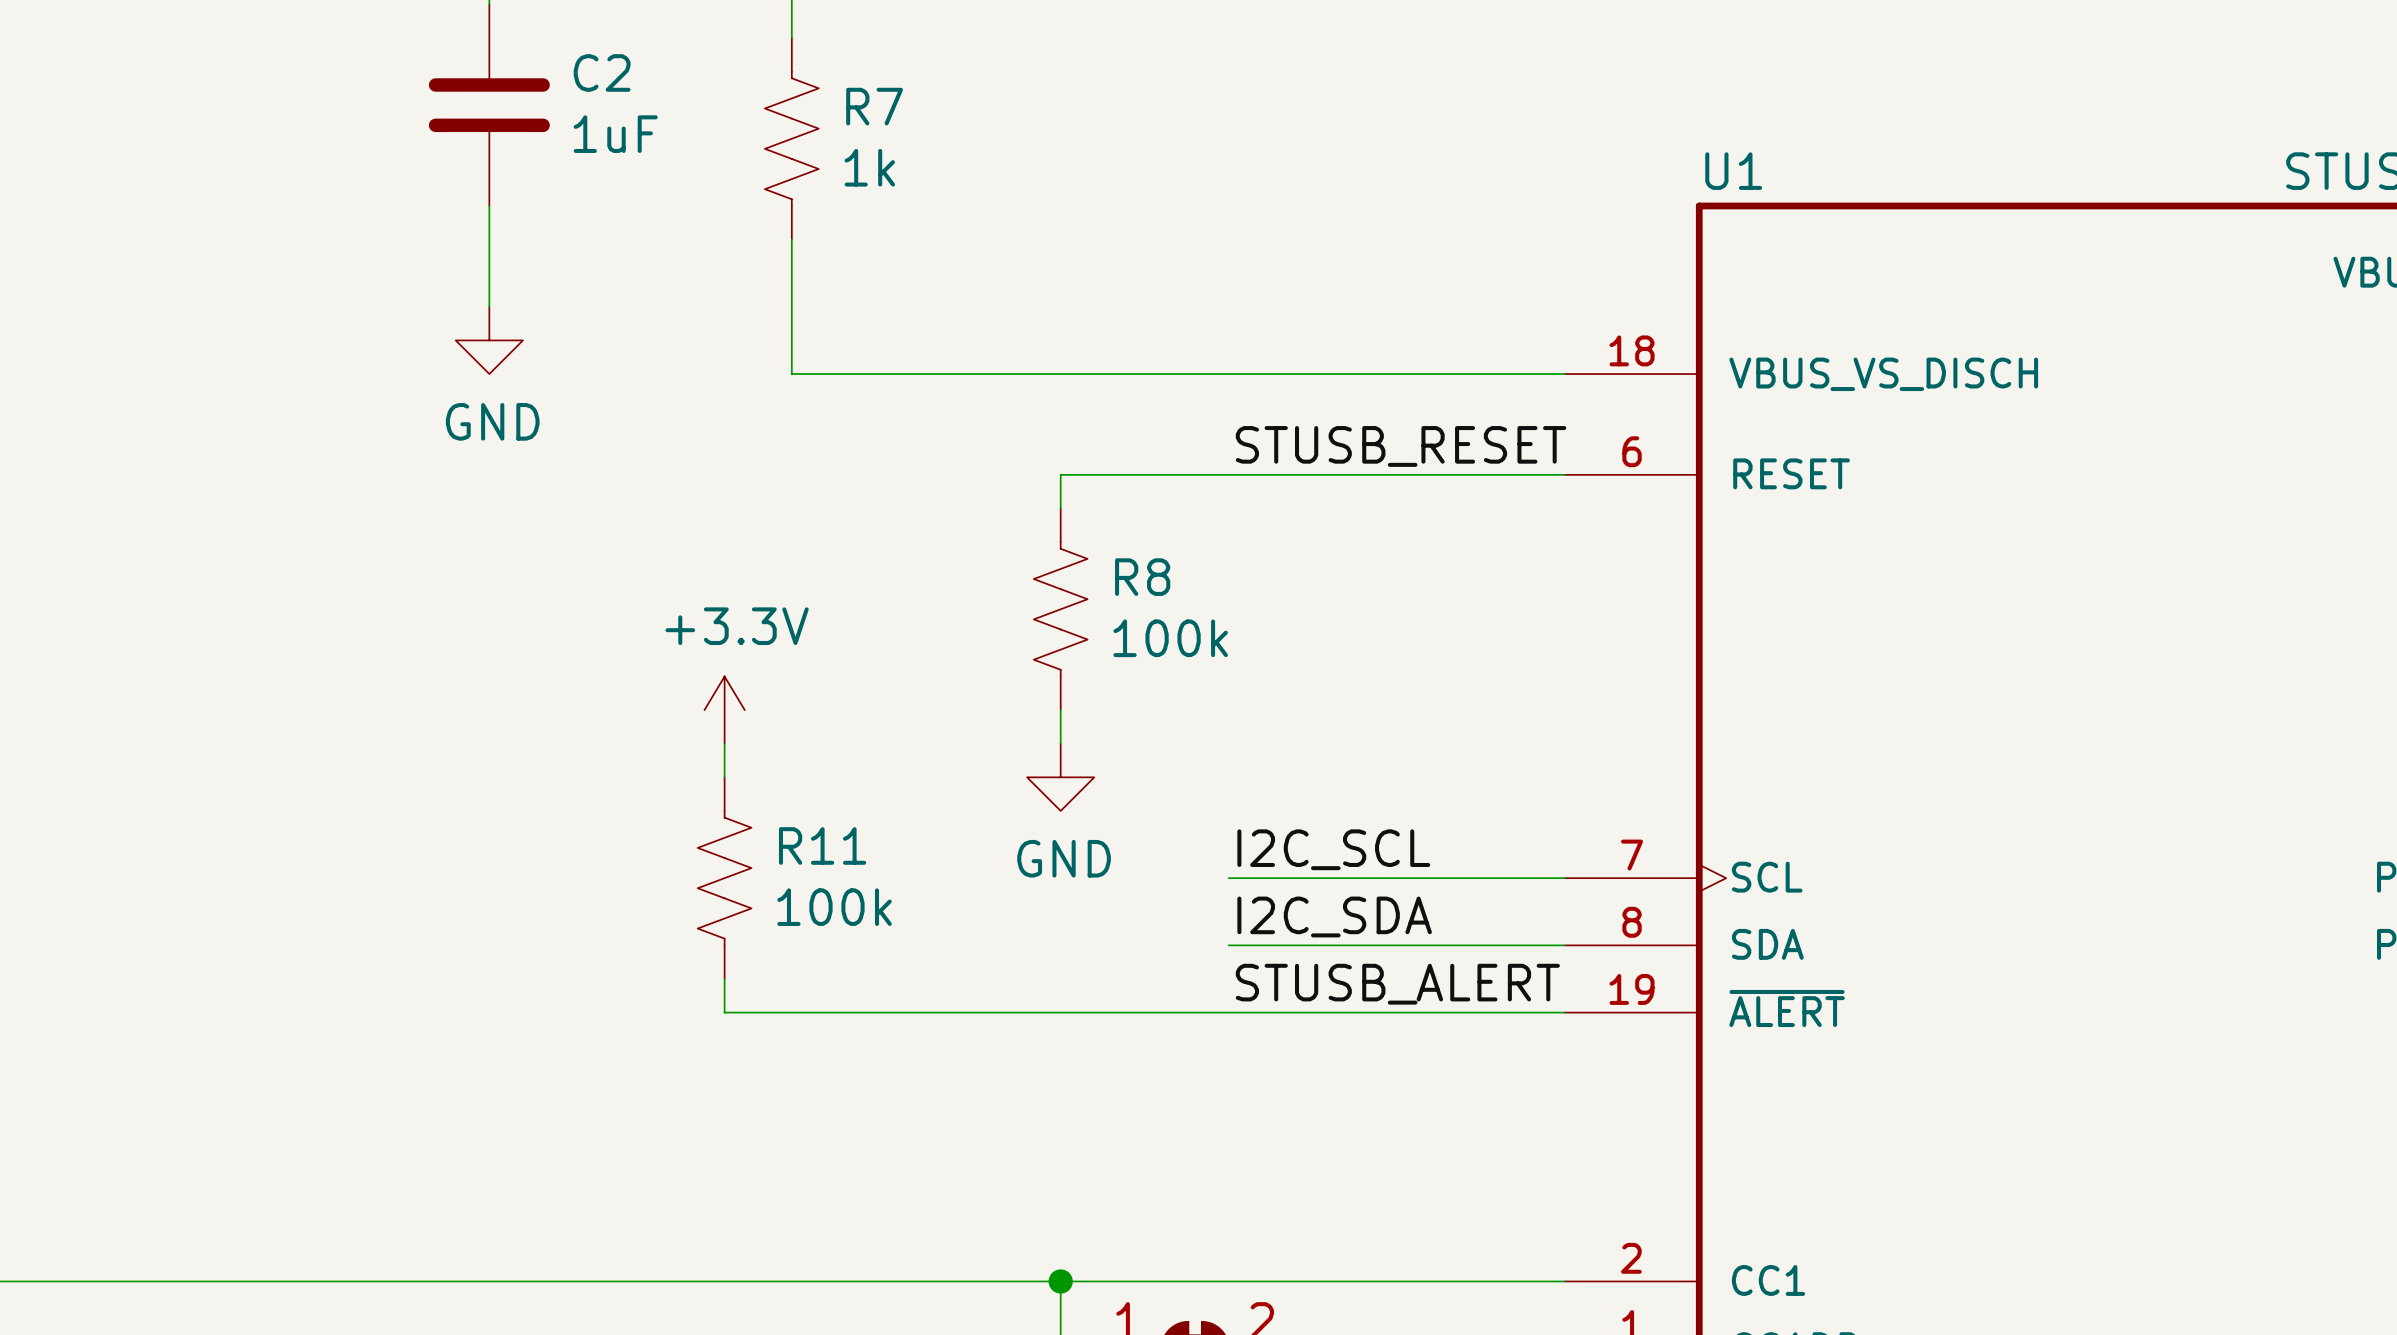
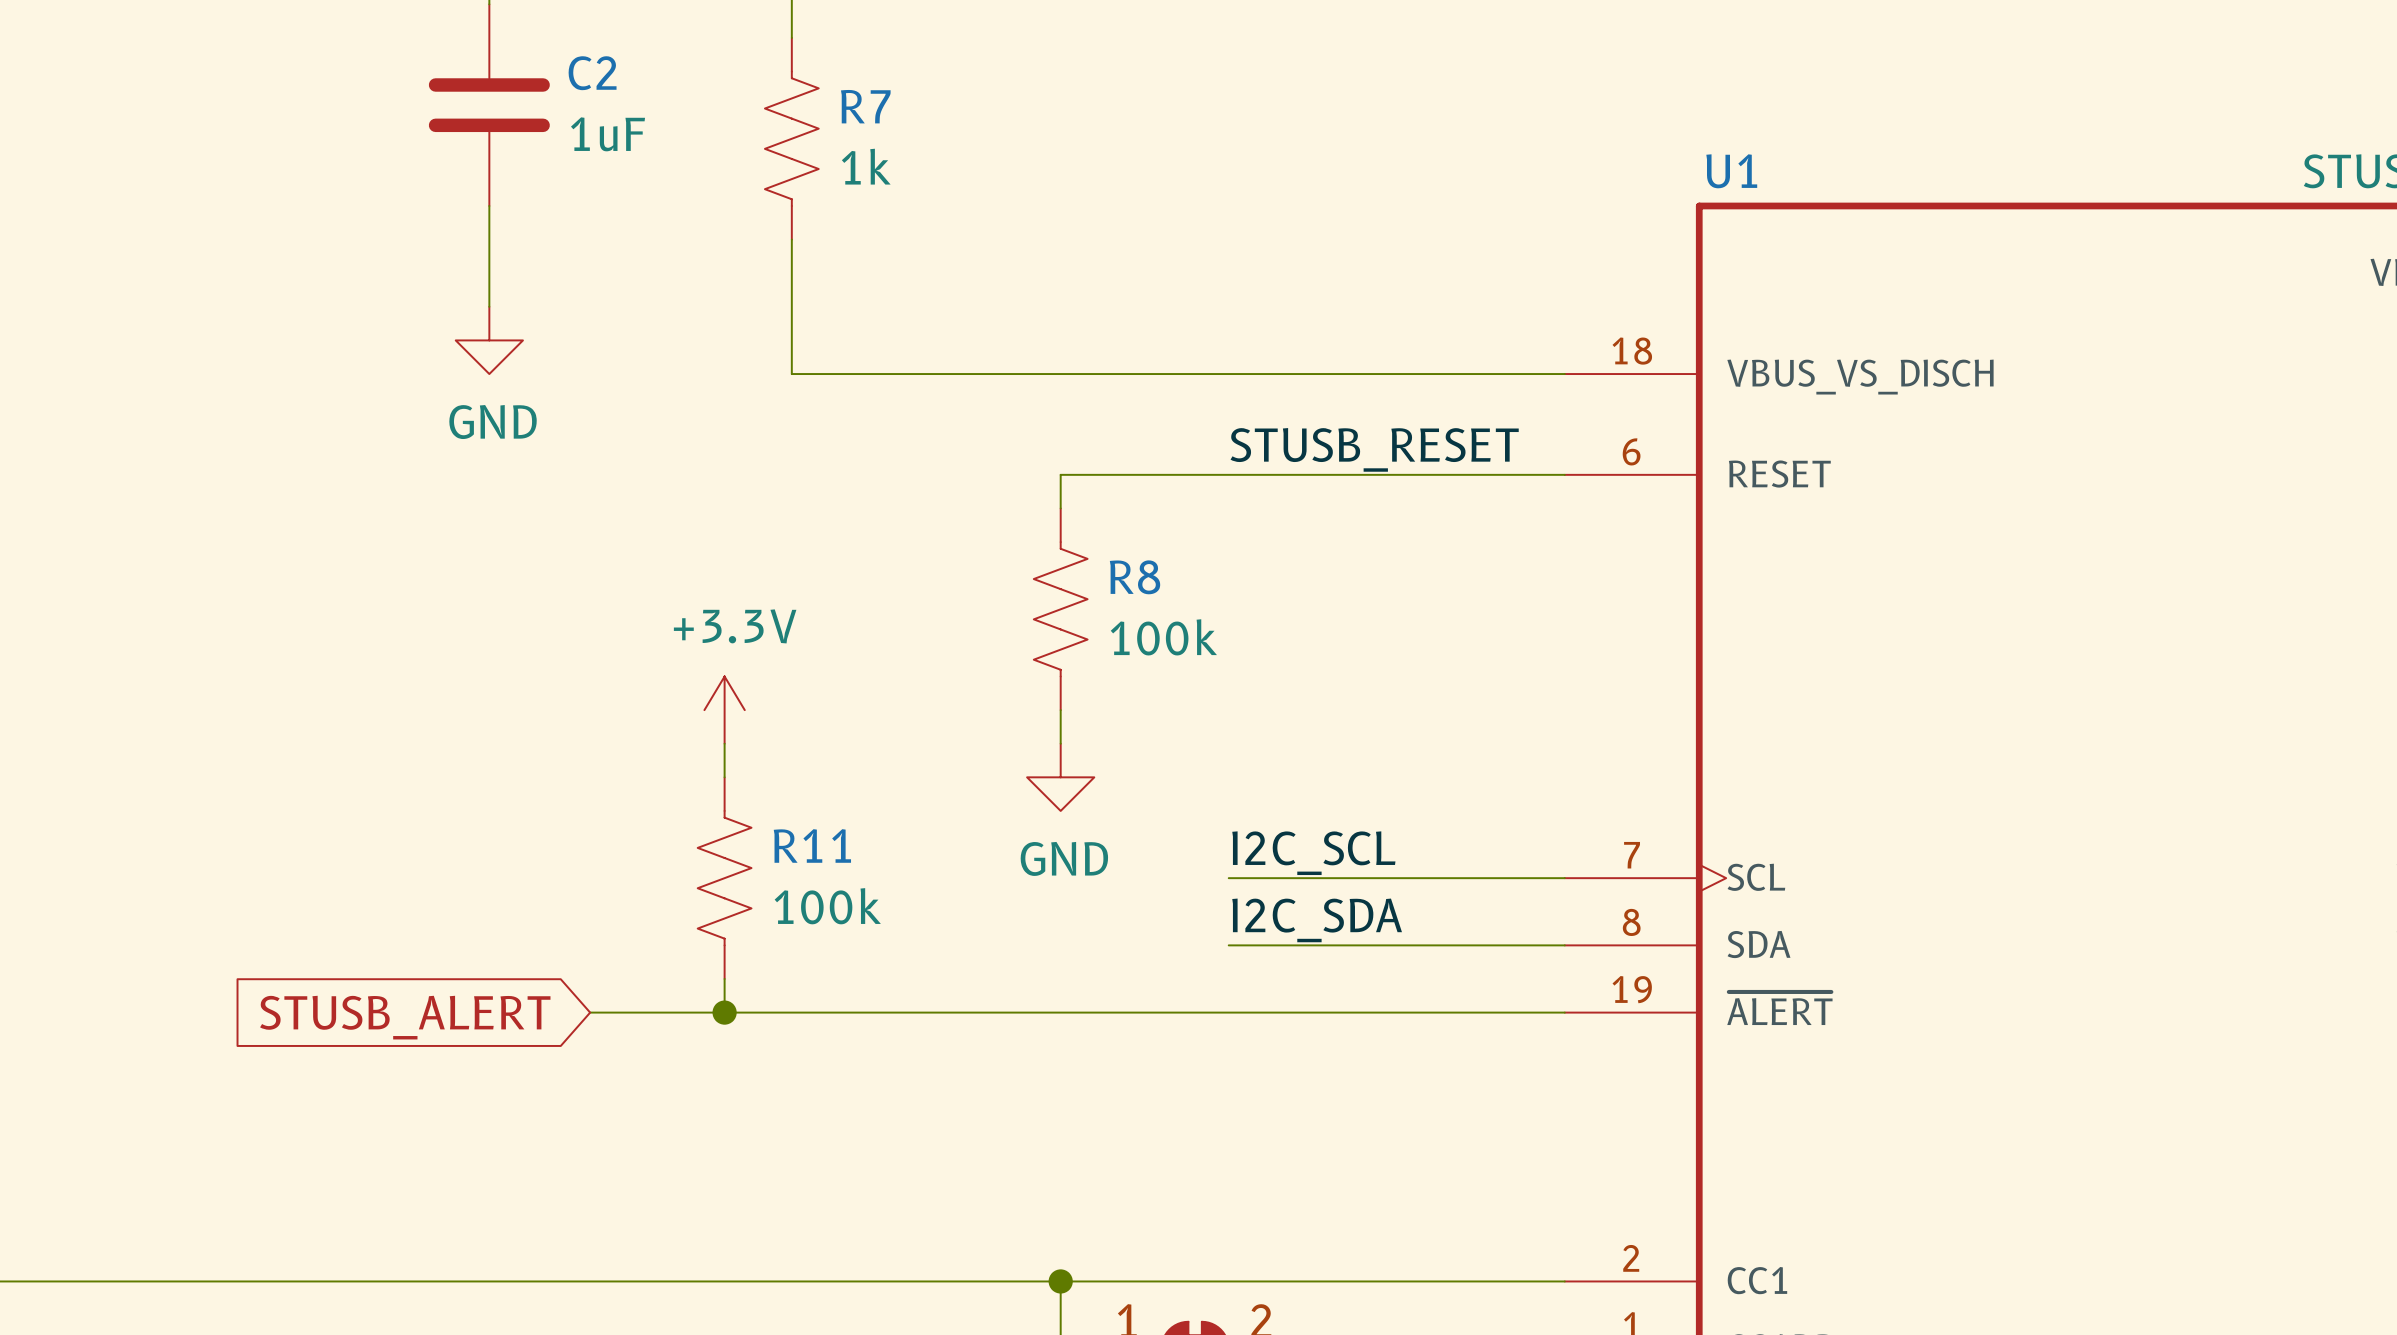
label: STUSB_ALERT (1397, 984) -> none
wire: none -> (590, 1012) (724, 1012)
junction: none -> (724, 1012)
global label: none -> STUSB_ALERT (405, 1017)

